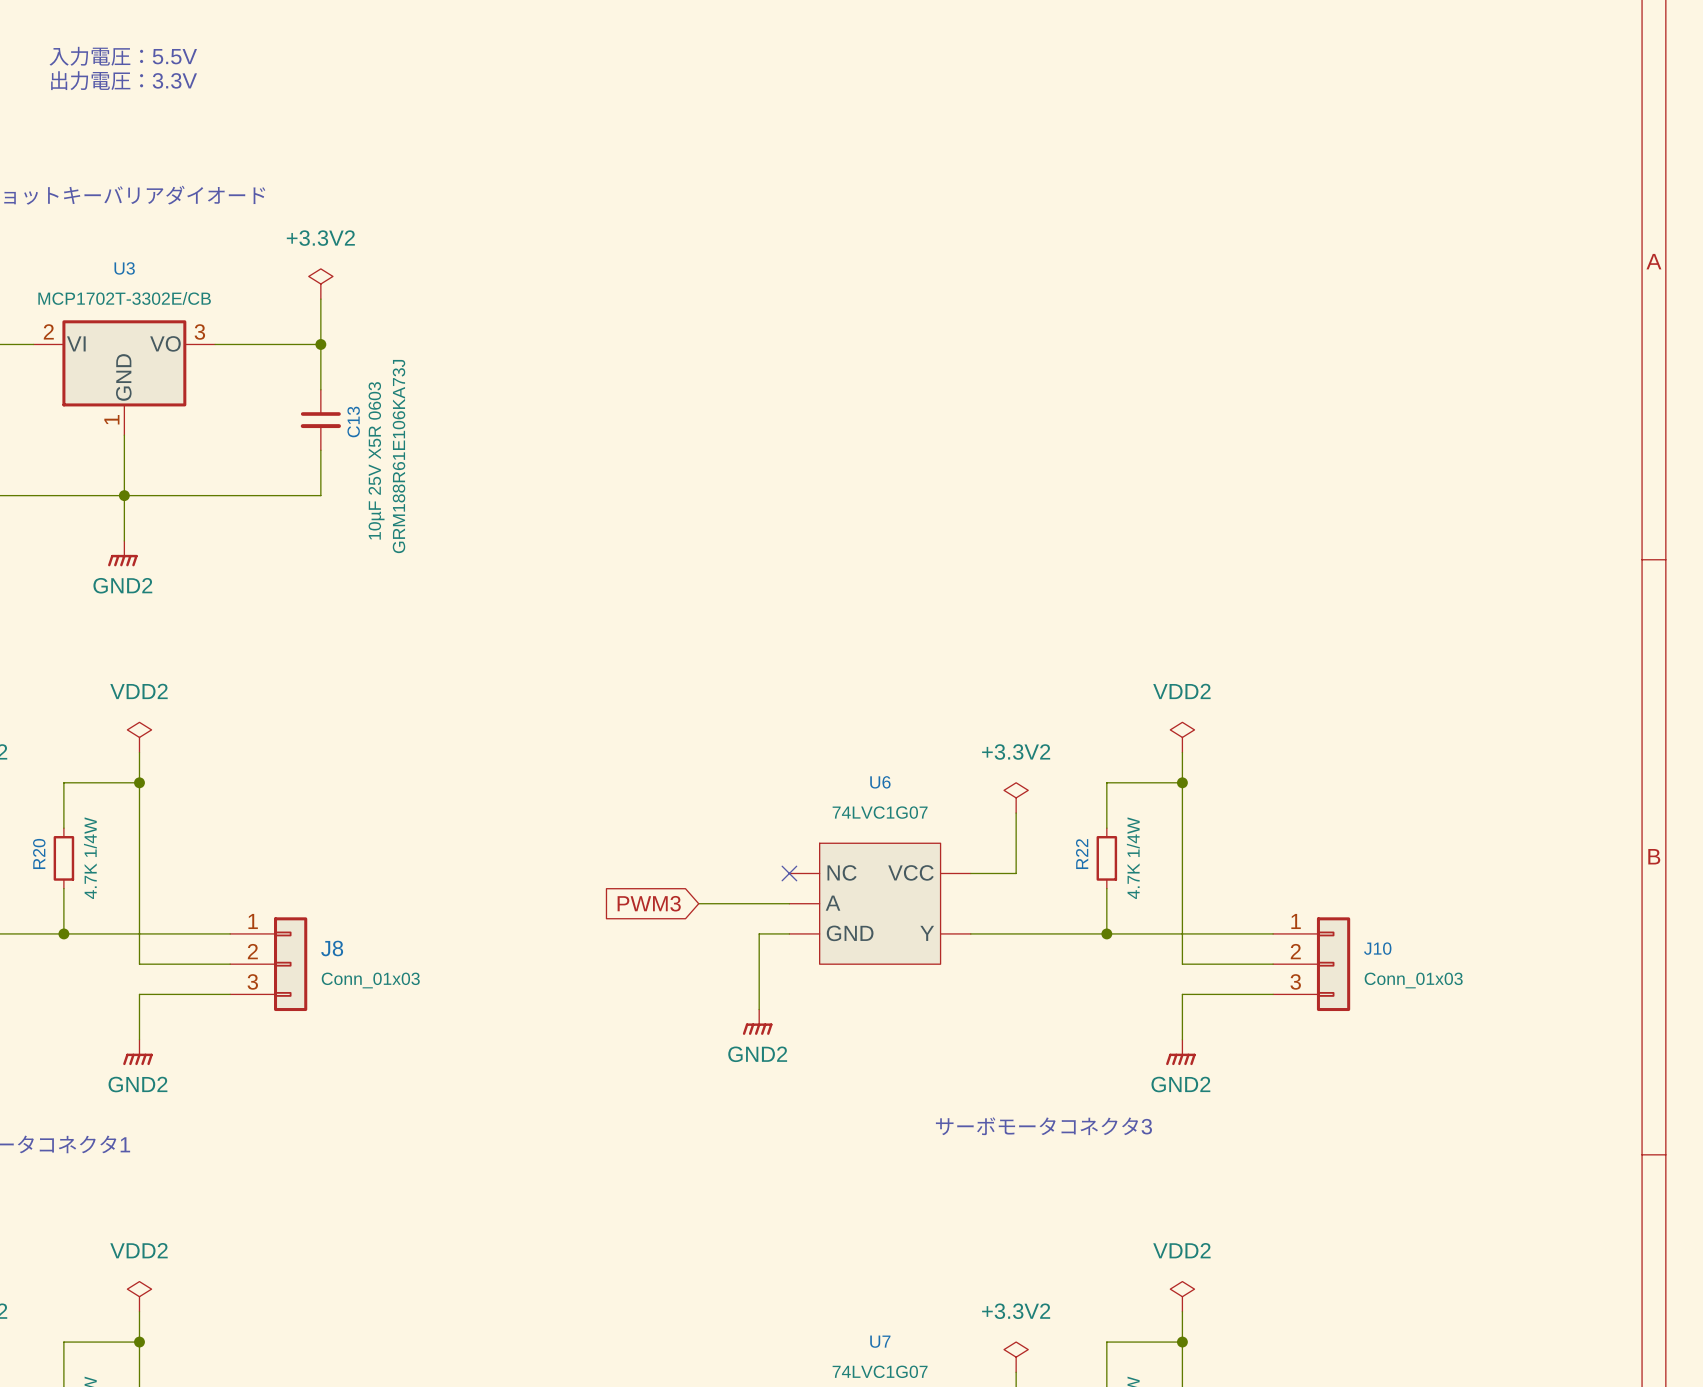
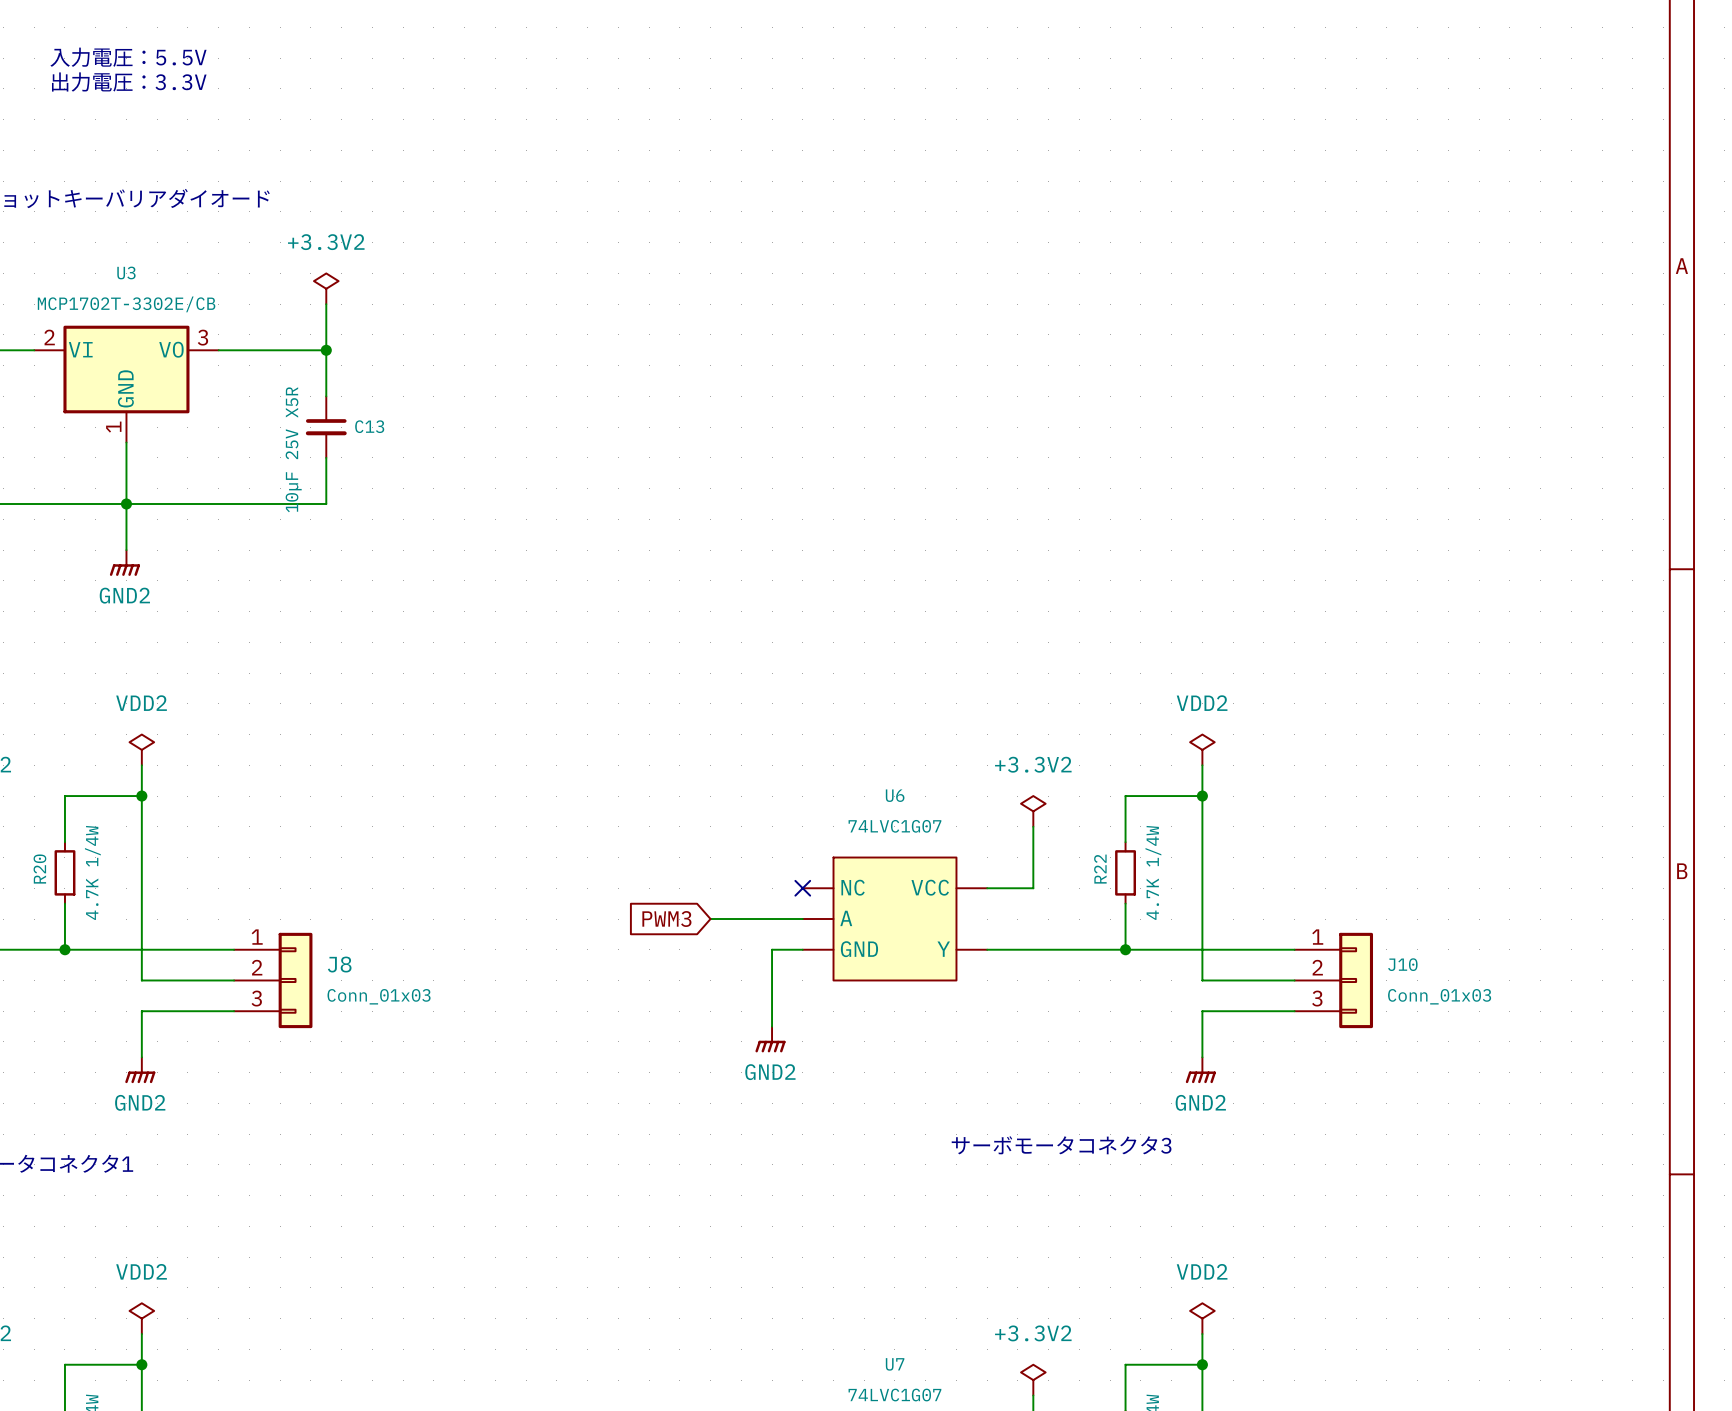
C13 name rotation: 0° (353, 422) -> 90° clockwise (369, 426)
C13 text: GRM188R61E106KA73J (399, 456) -> none
C13 value: 10µF 25V X5R 0603 (376, 460) -> 10µF 25V X5R (293, 449)

